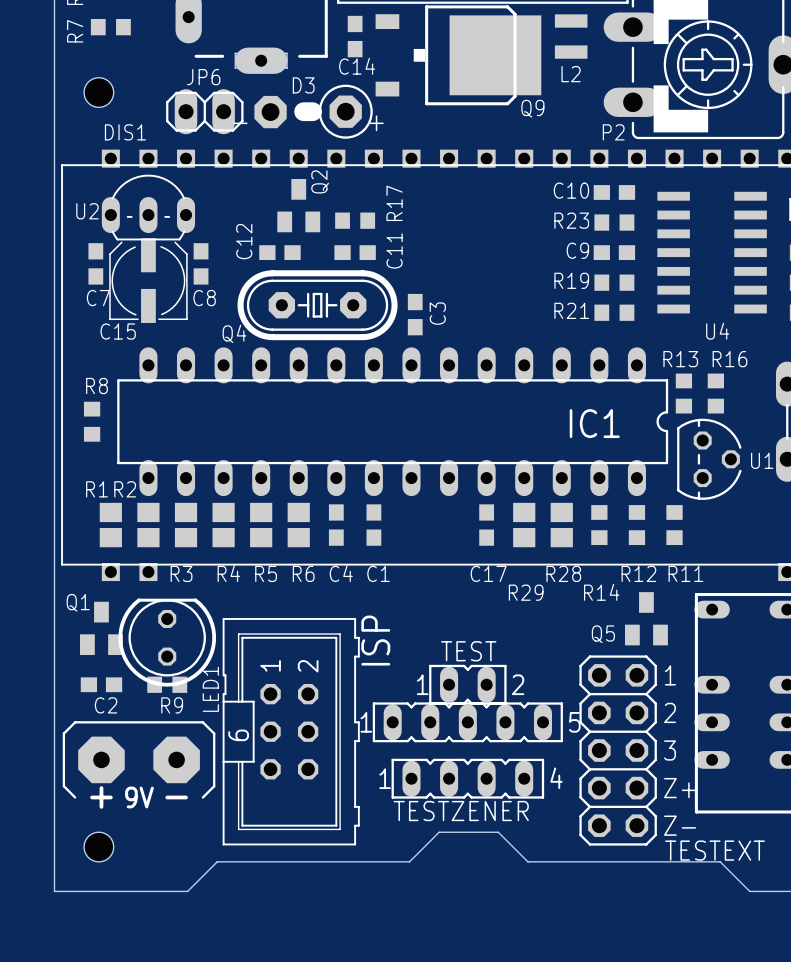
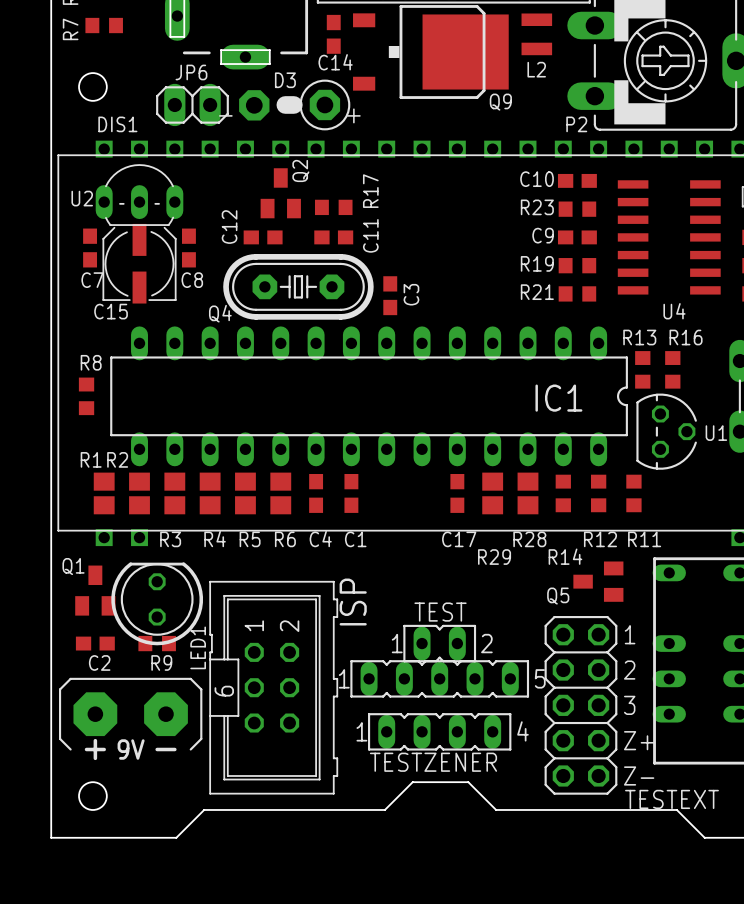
Q5 rotation: 0° (646, 618) -> 90° counterclockwise (598, 581)

